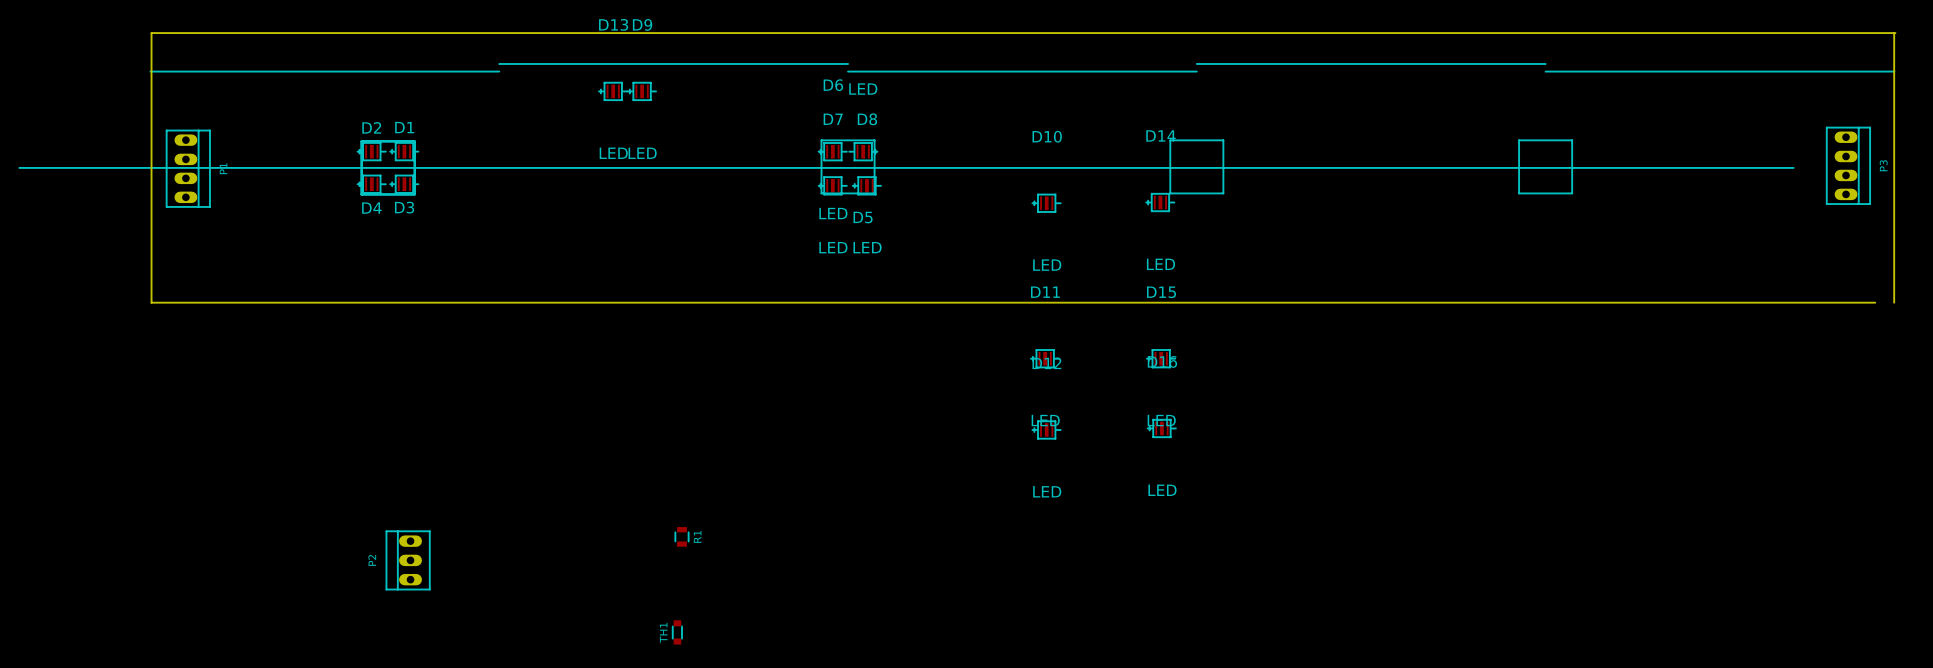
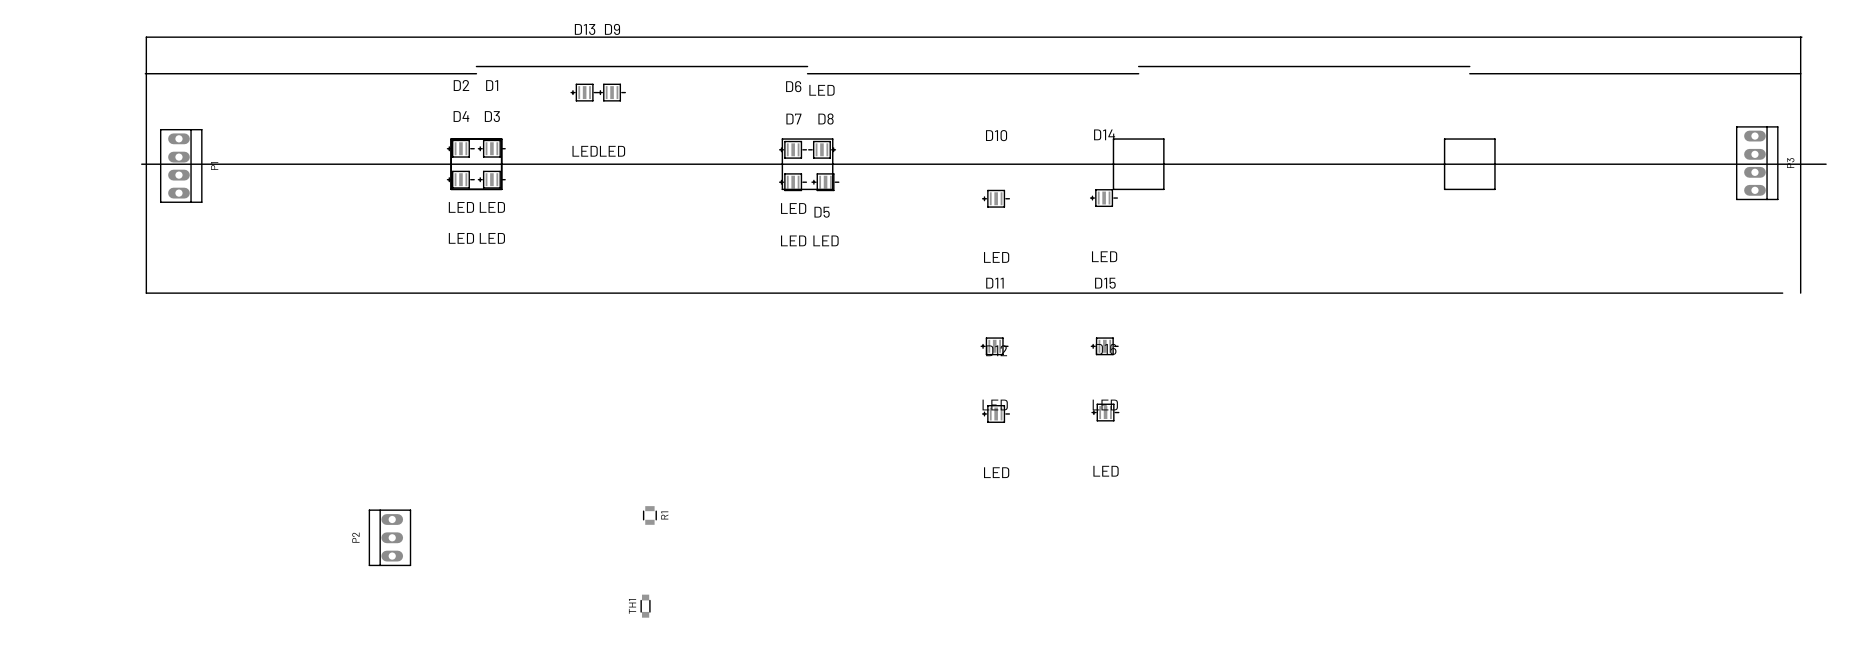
D2 name position: D2 (371, 127) -> D2 (461, 85)
D1 name position: D1 (404, 127) -> D1 (492, 85)
line: (361, 141) (414, 141) (414, 194) (361, 194) (361, 141) -> (451, 139) (501, 139) (501, 189) (451, 189) (451, 139)
D2 position: (371, 151) -> (460, 148)
D1 position: (404, 151) -> (491, 148)
line: (19, 167) (1793, 167) -> (141, 164) (1826, 164)
D4 position: (371, 184) -> (460, 179)
D3 position: (404, 184) -> (491, 179)
D3 name position: D3 (404, 207) -> D3 (492, 116)
D4 name position: D4 (371, 208) -> D4 (461, 116)
D2 value: none -> LED (461, 207)
D1 value: none -> LED (492, 207)
D4 value: none -> LED (461, 238)
D3 value: none -> LED (492, 238)

